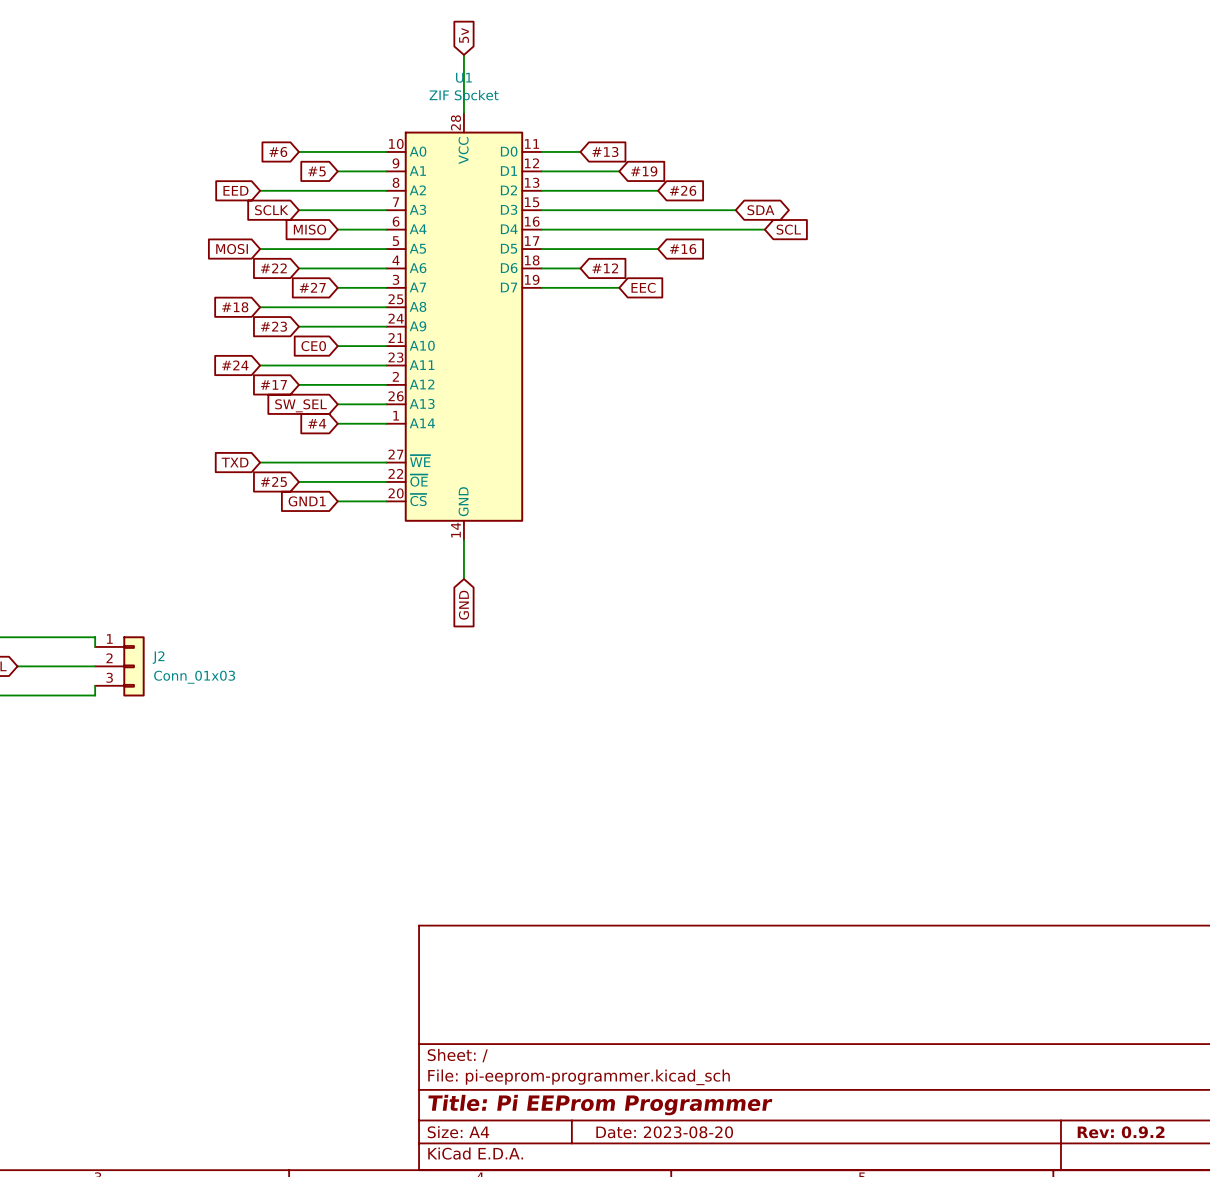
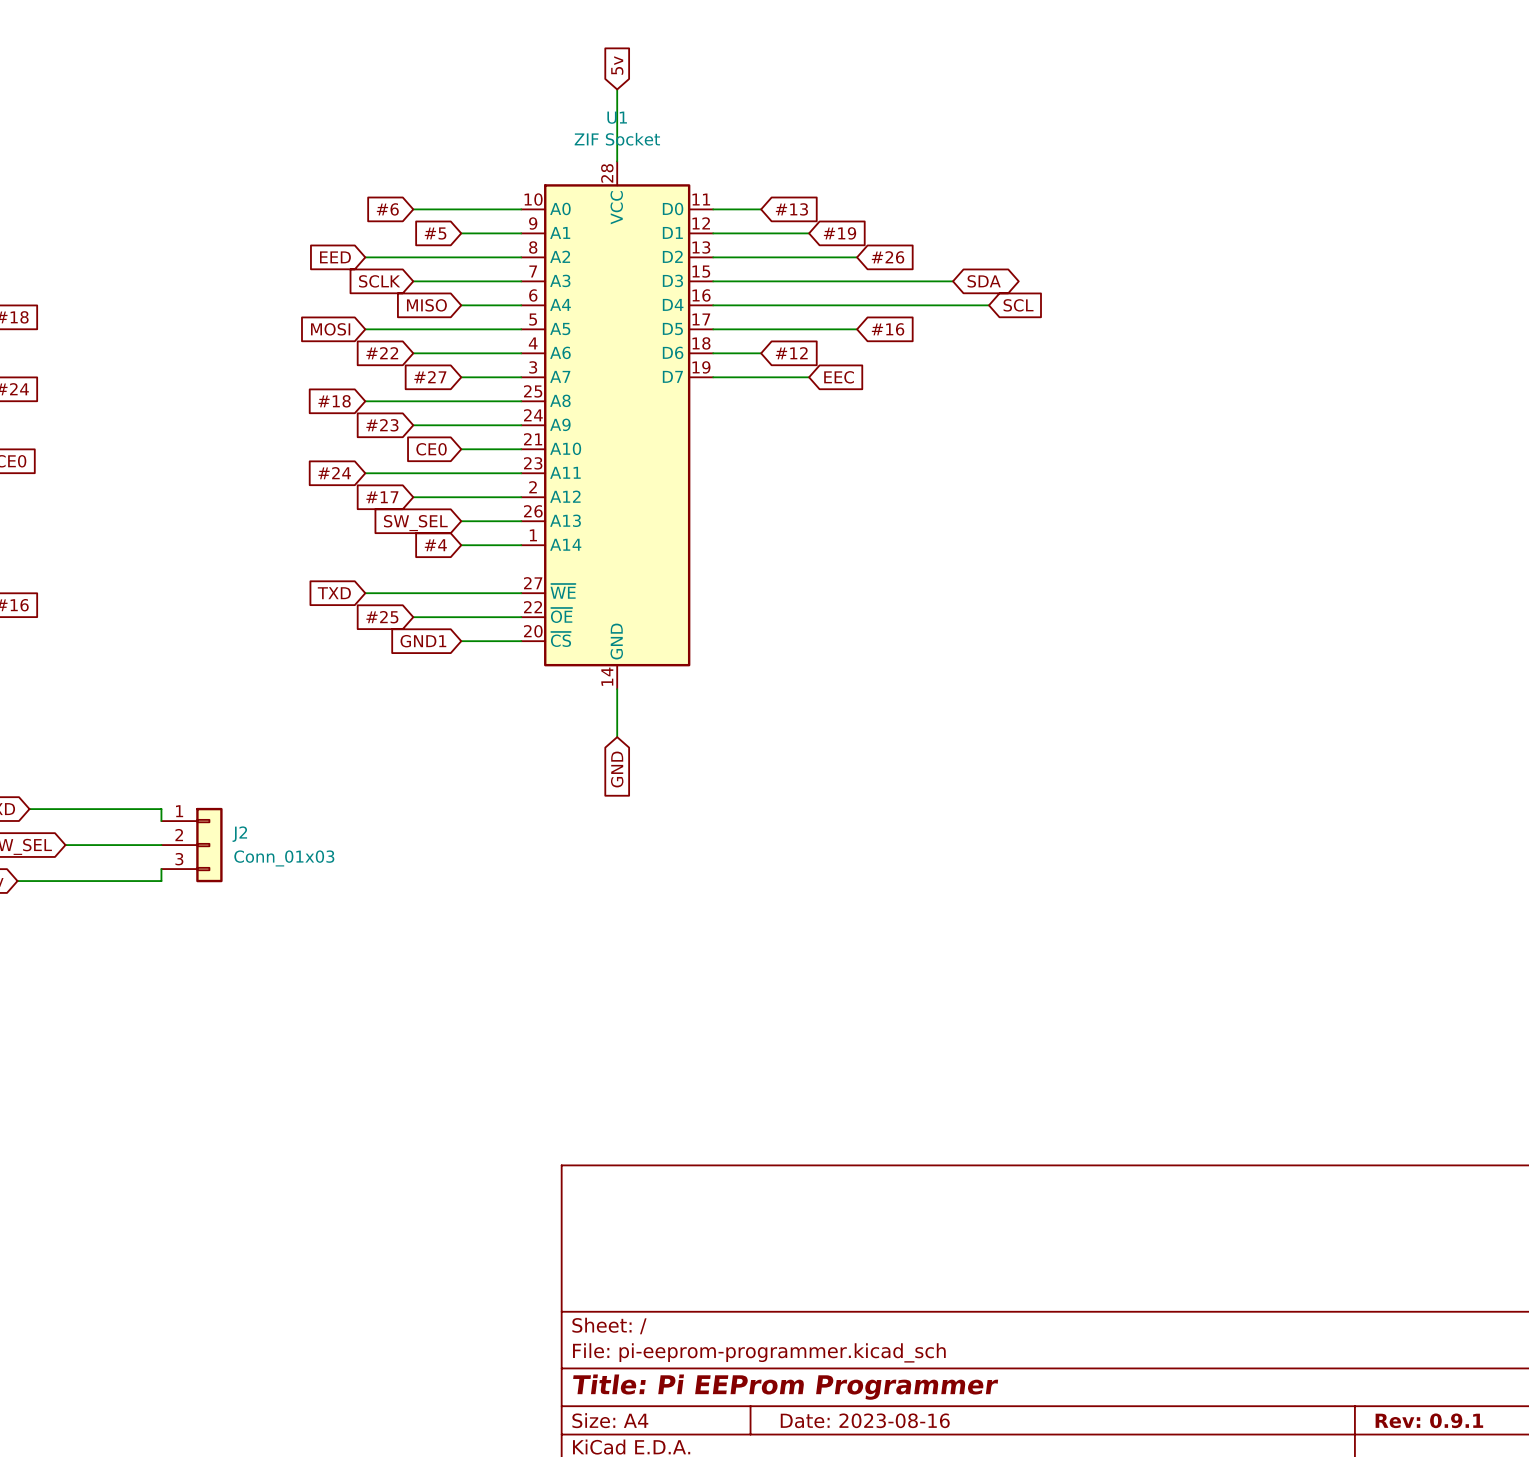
title block: Date: 2023-08-20 (664, 1132) -> Date: 2023-08-16 (865, 1420)
title block: Rev: 0.9.2 (1121, 1132) -> Rev: 0.9.1 (1429, 1420)

